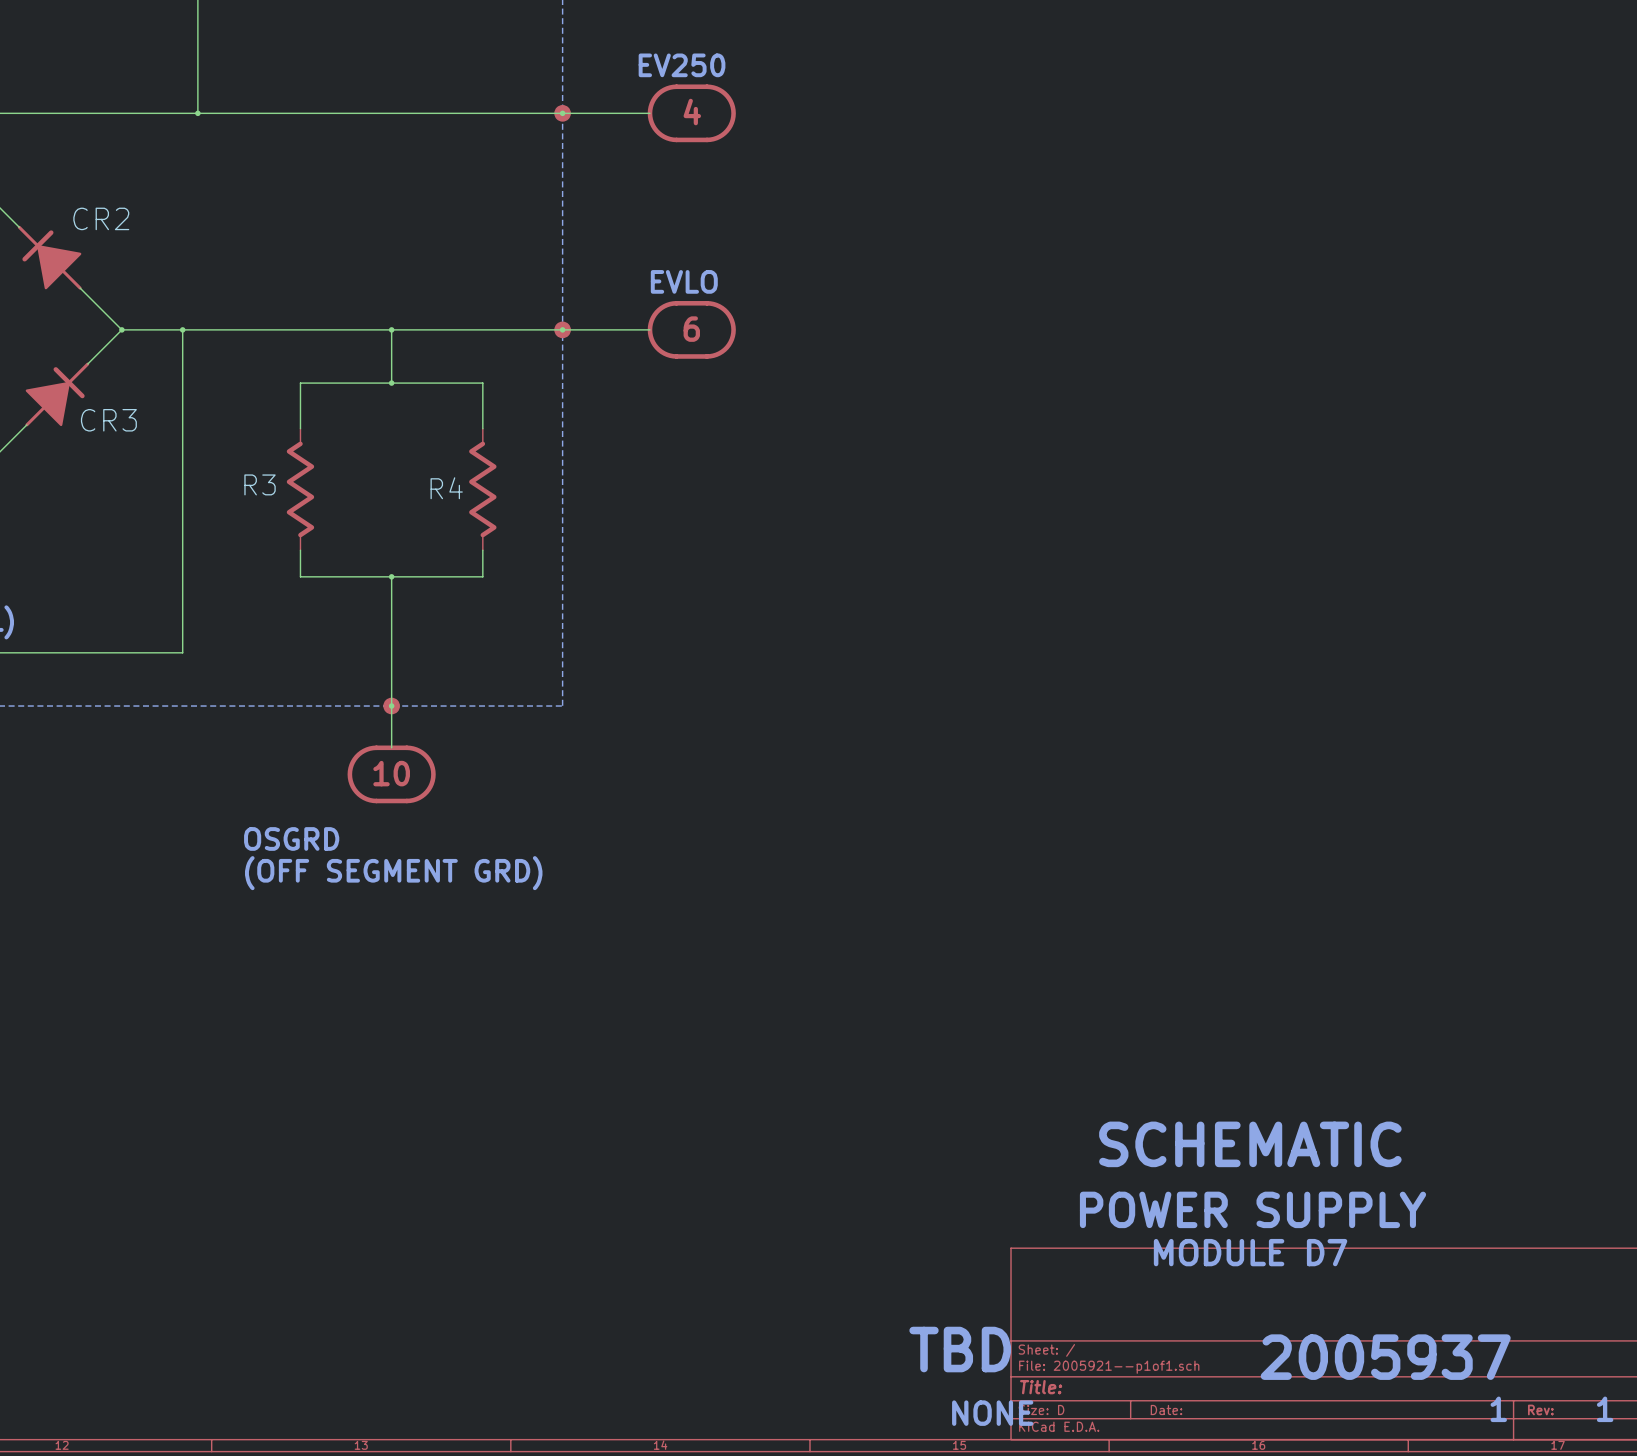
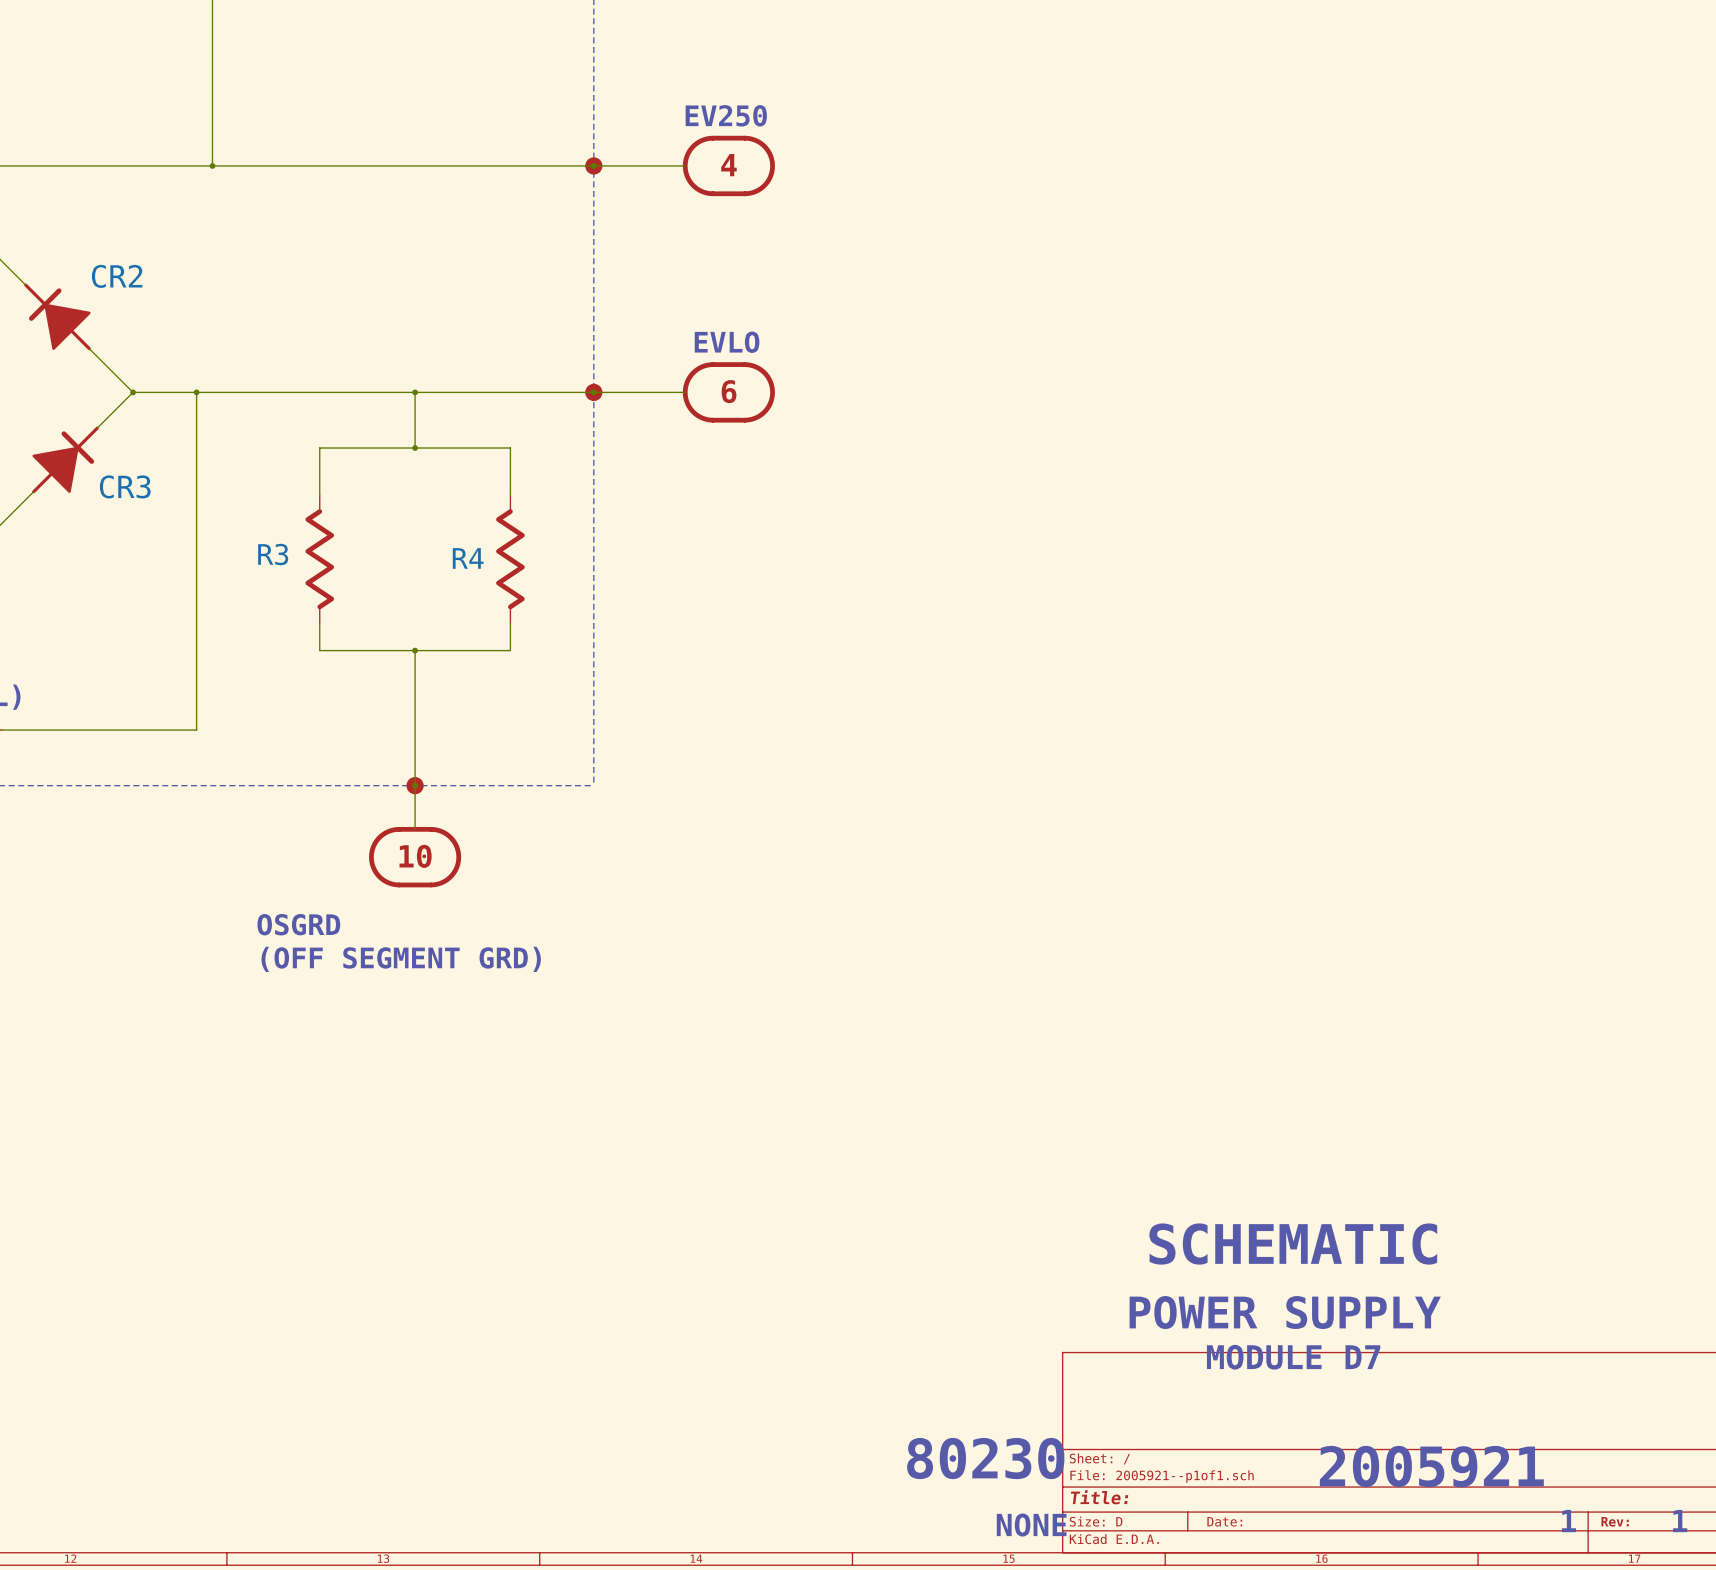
text: none -> 80230 (985, 1458)
text: TBD (960, 1349) -> none
text: 2005937 (1385, 1357) -> 2005921 (1431, 1466)

